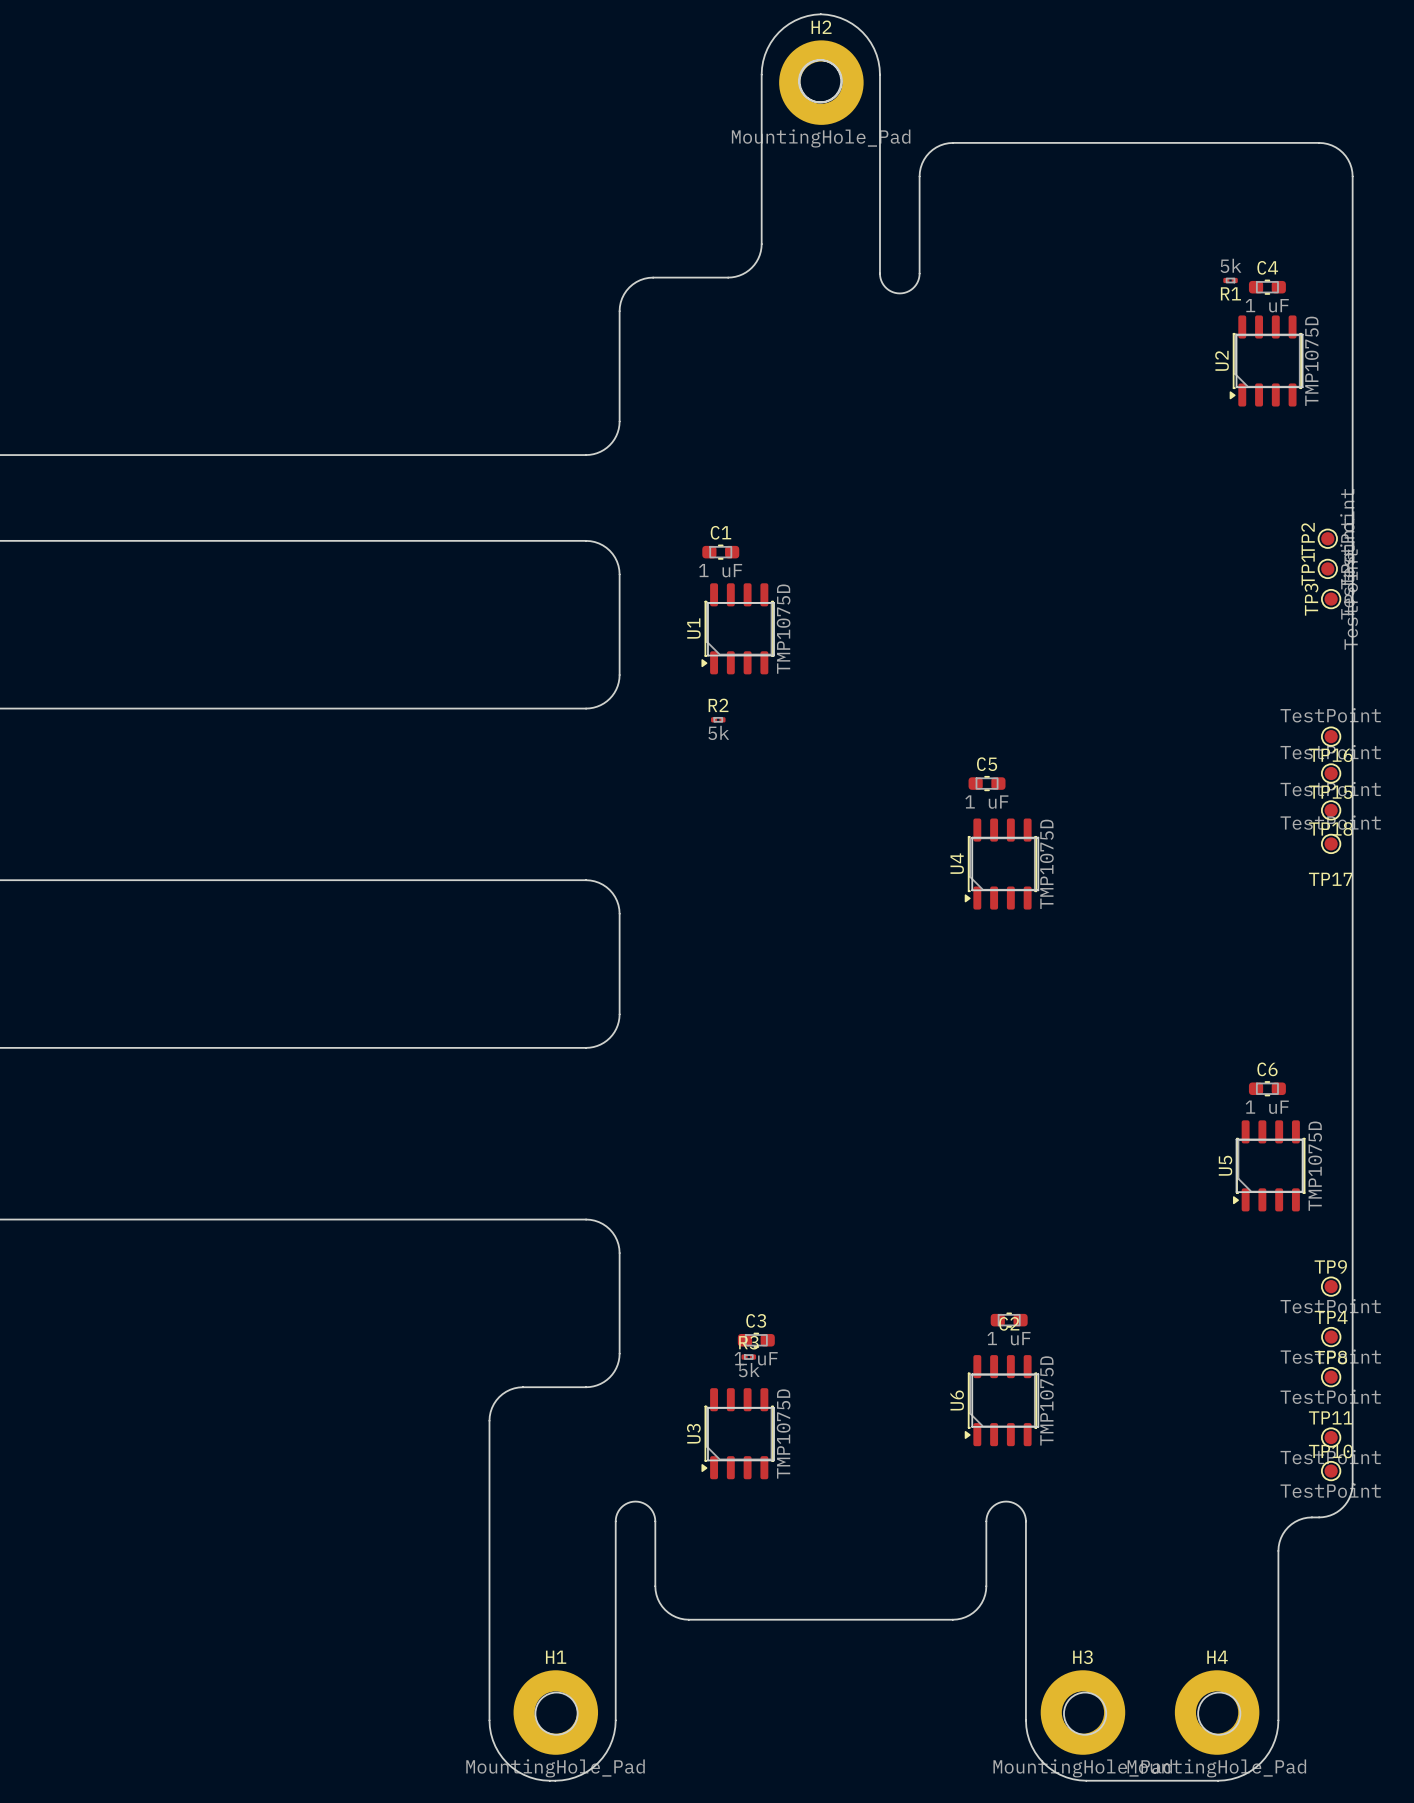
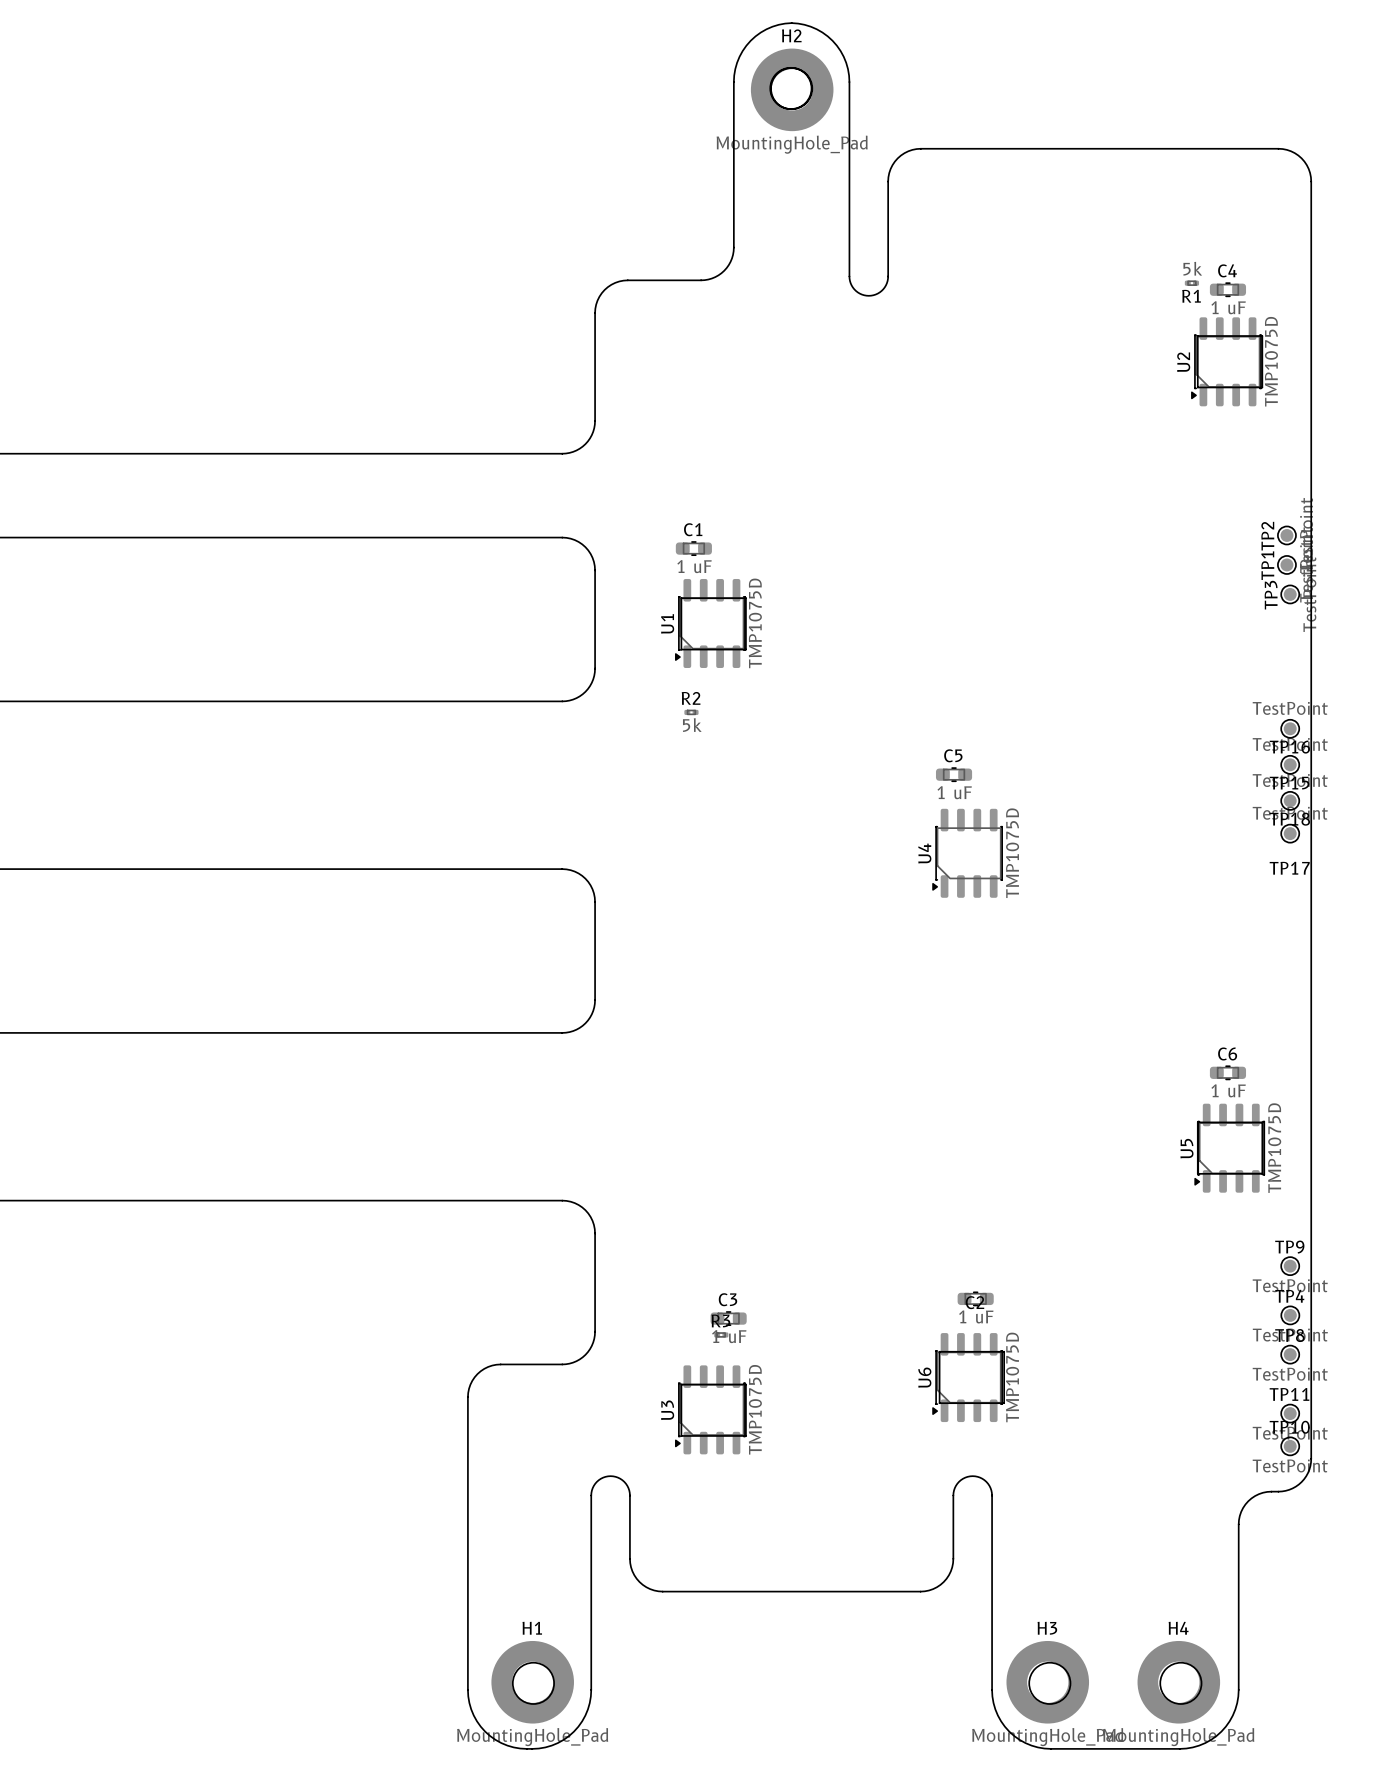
board edge: (972, 837) (972, 890) (1038, 890) (1038, 837) (972, 837) -> none
R3 value: 5k (749, 1370) -> none

